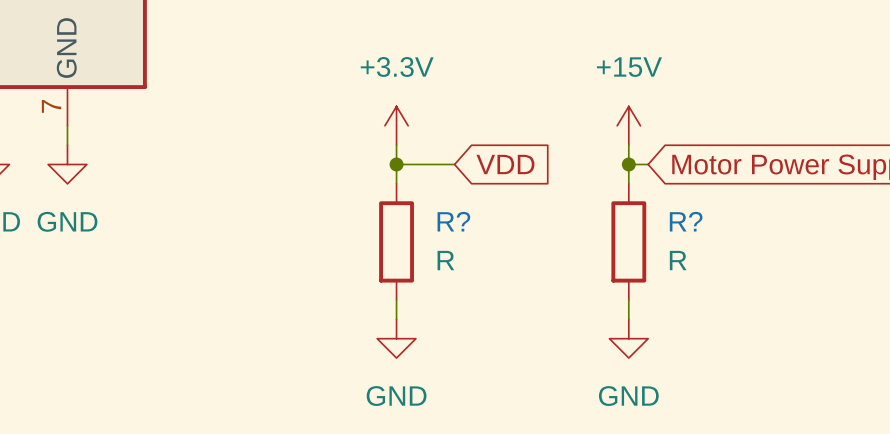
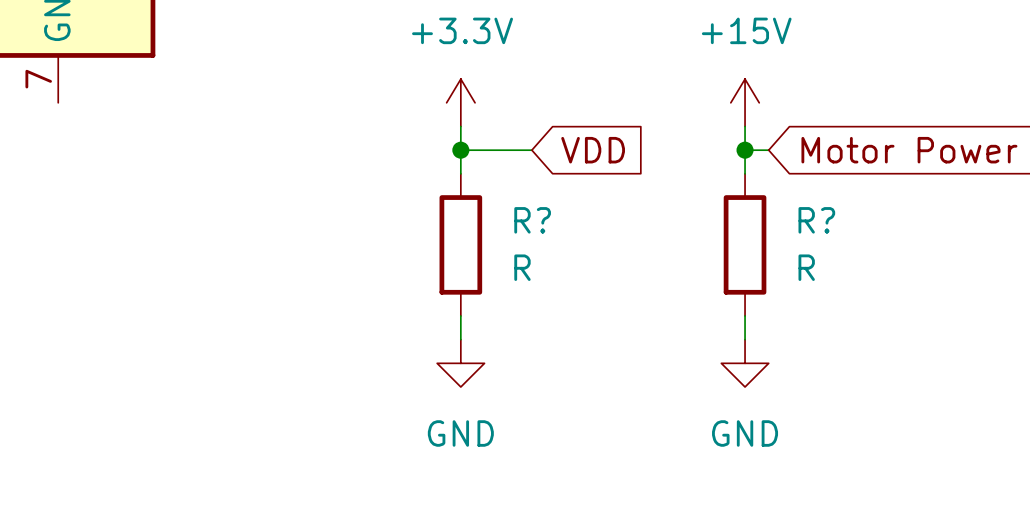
wire: (67, 125) (67, 145) -> none
power symbol: GND (67, 164) -> none

